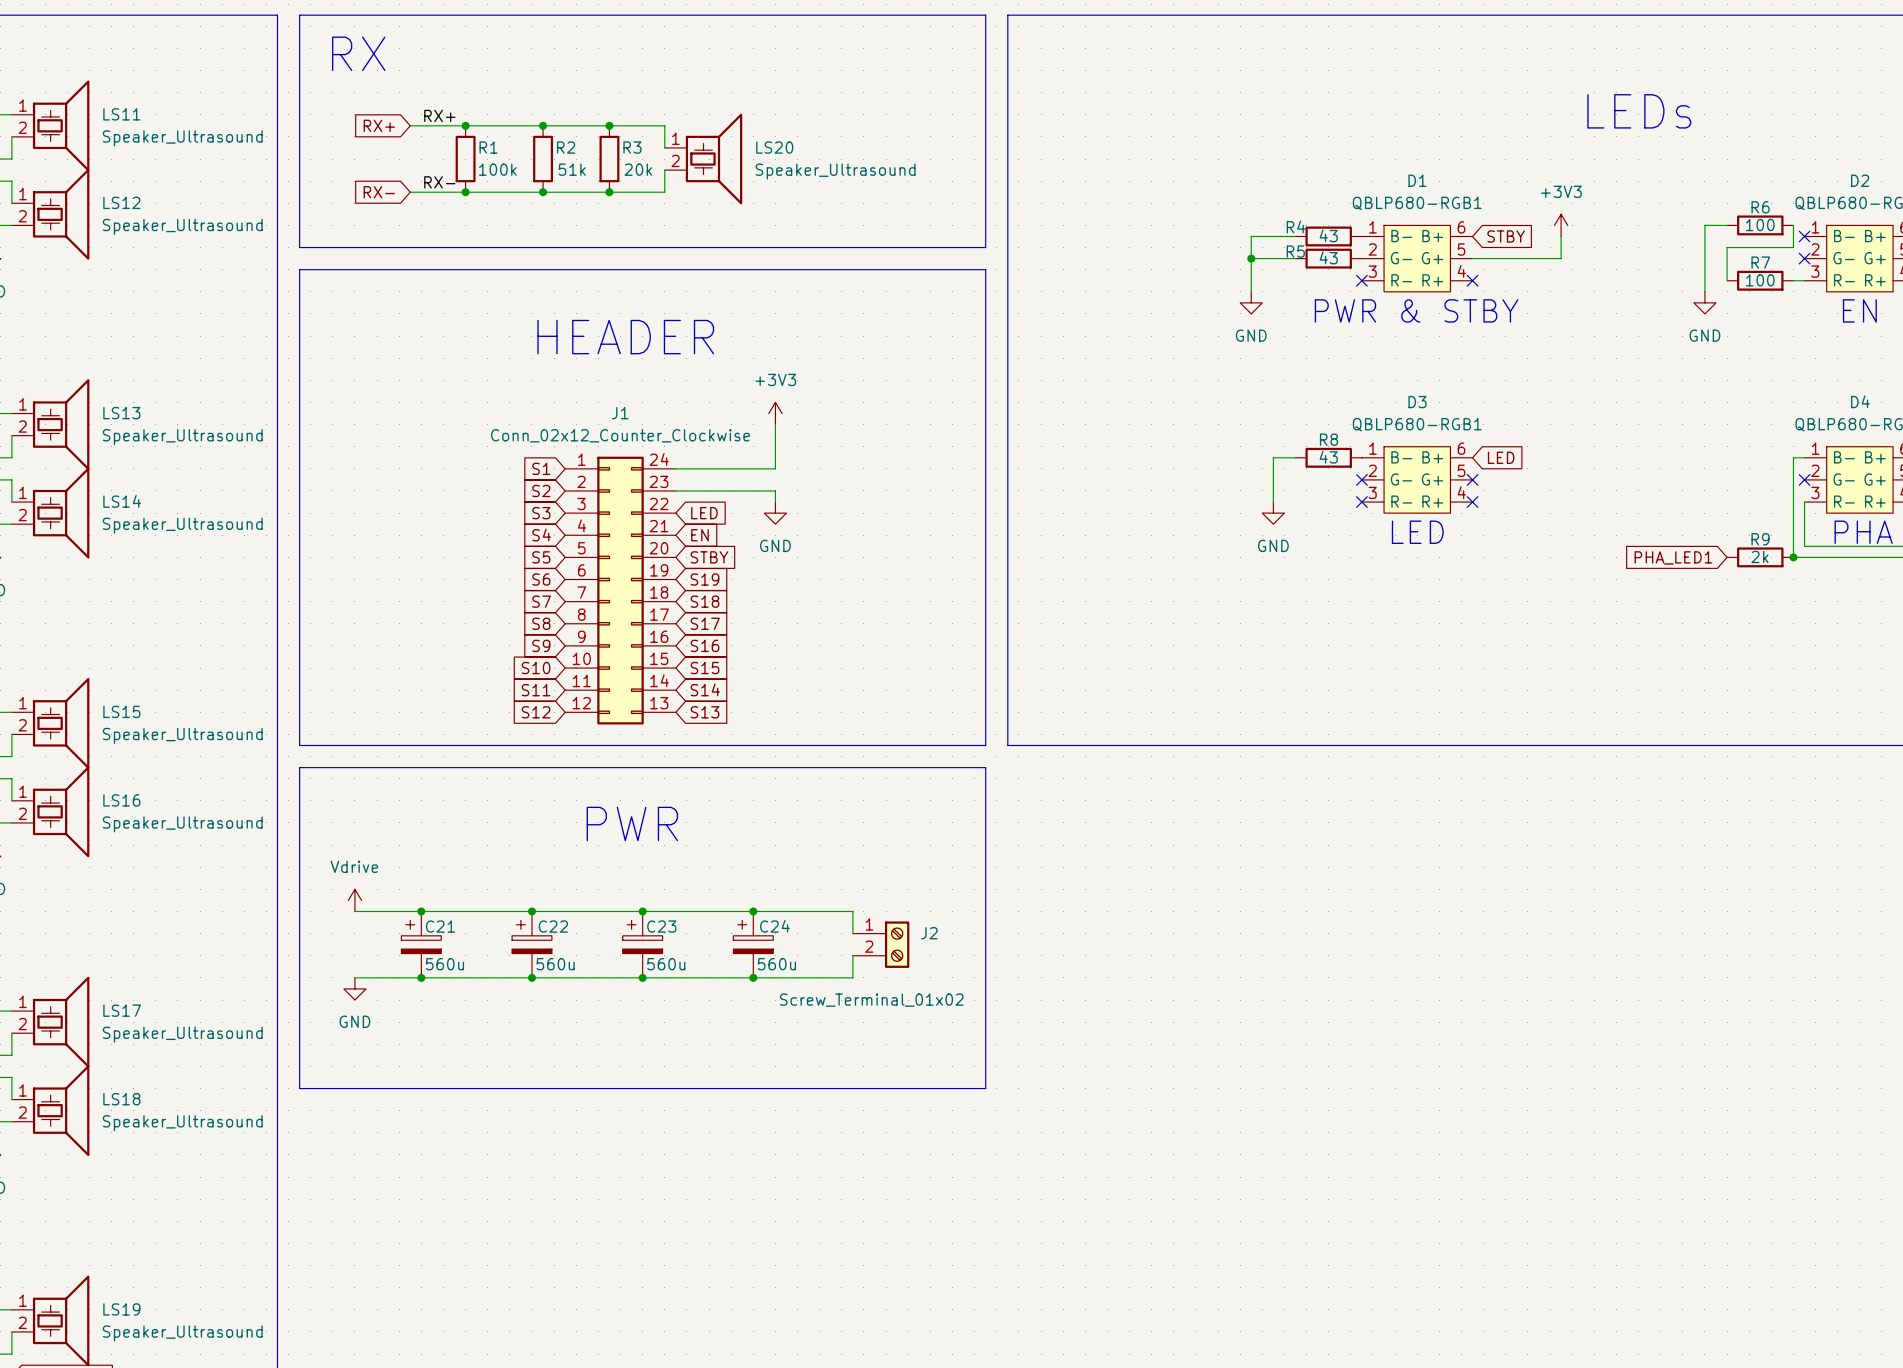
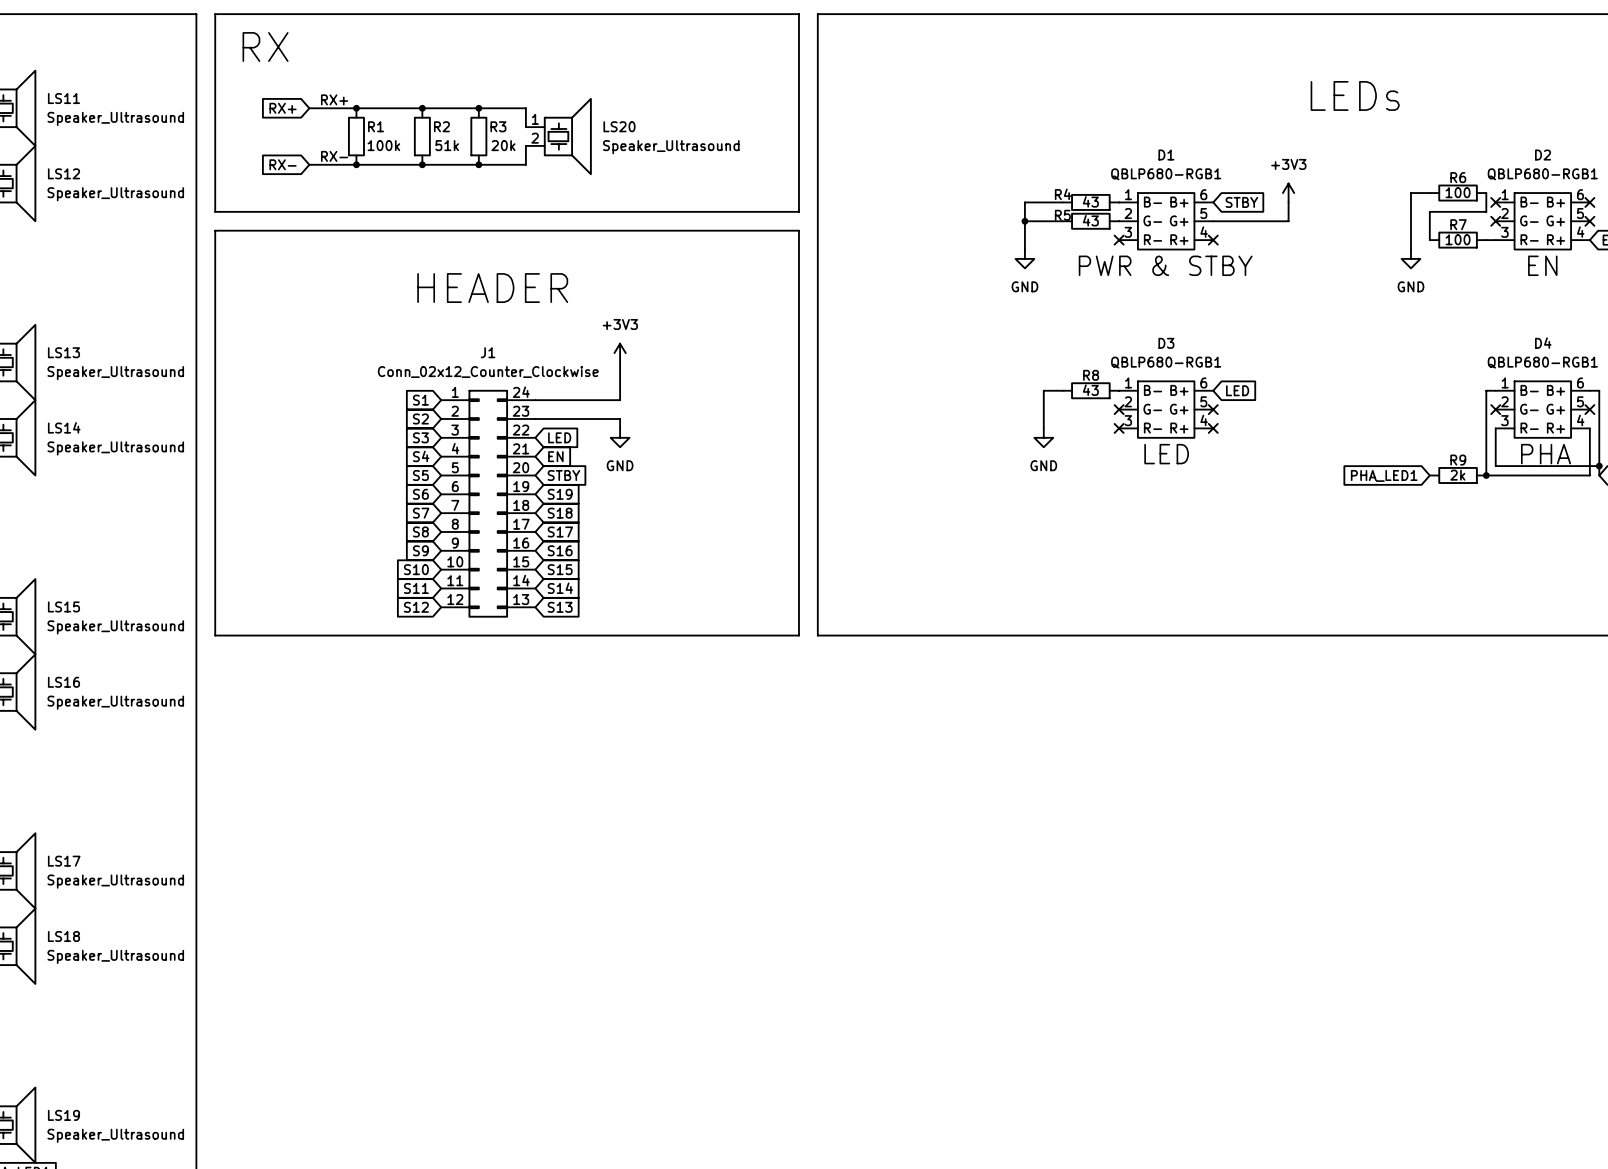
line: (299, 767) (985, 767) (985, 1088) (299, 1088) (299, 767) -> none
text: PWR (632, 823) -> none
power symbol: Vdrive (354, 900) -> none
wire: (354, 911) (852, 911) (852, 933) -> none
junction: (421, 911) -> none
junction: (531, 911) -> none
junction: (642, 911) -> none
junction: (753, 911) -> none
C21: 560u (421, 944) -> none
C22: 560u (531, 944) -> none
C23: 560u (642, 944) -> none
C24: 560u (753, 944) -> none
J2: Screw_Terminal_01x02 (881, 944) -> none
wire: (852, 955) (852, 977) (354, 977) -> none
junction: (421, 977) -> none
junction: (531, 977) -> none
junction: (642, 977) -> none
junction: (753, 977) -> none
power symbol: GND (354, 988) -> none

